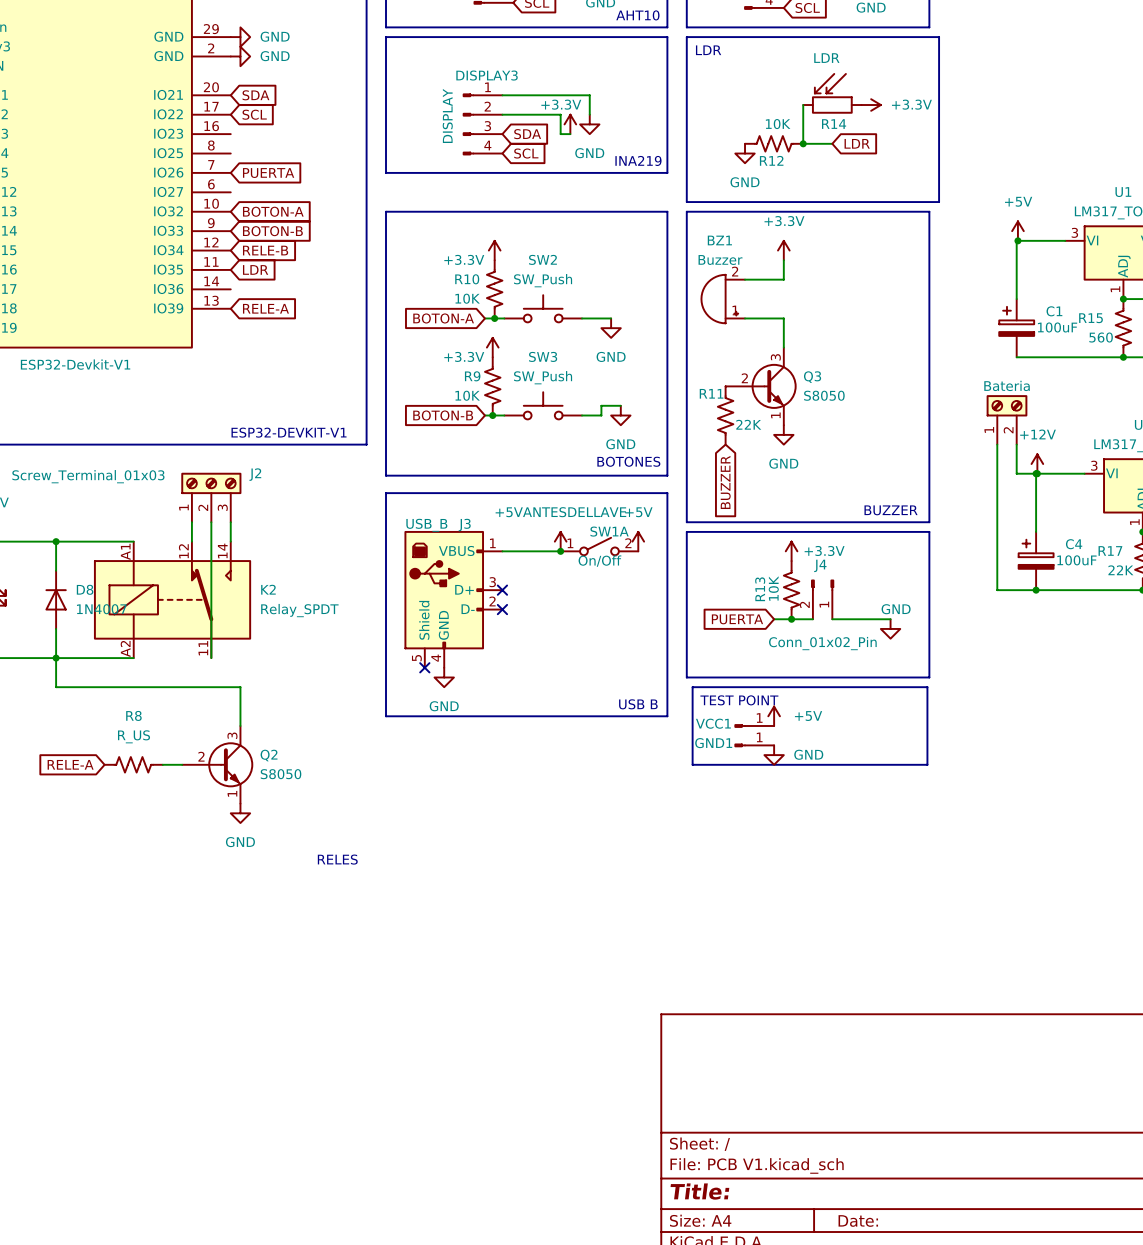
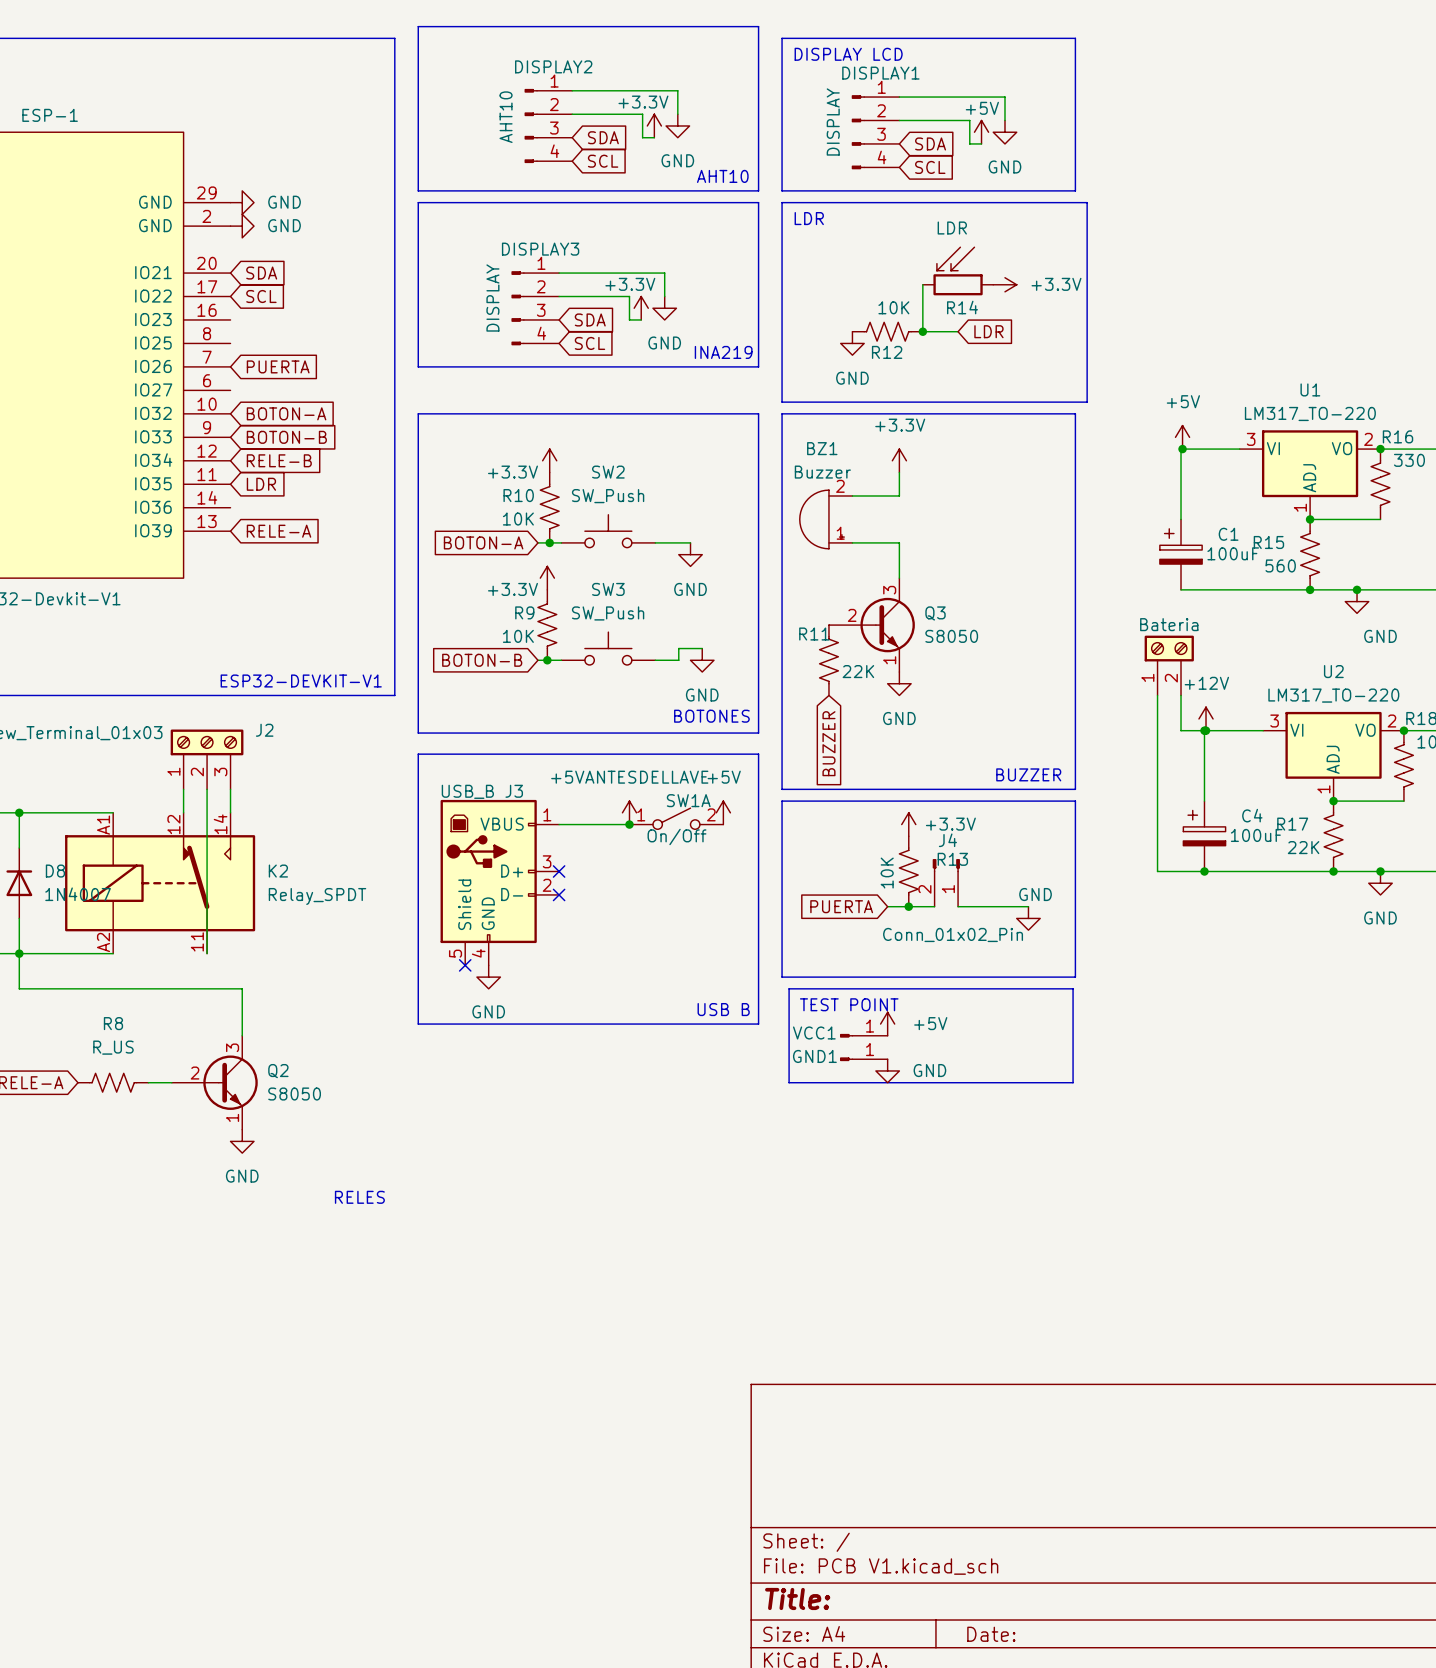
R13 name rotation: 0° (760, 589) -> 90° clockwise (952, 859)
R13 name position: R13 (760, 589) -> R13 (952, 859)

